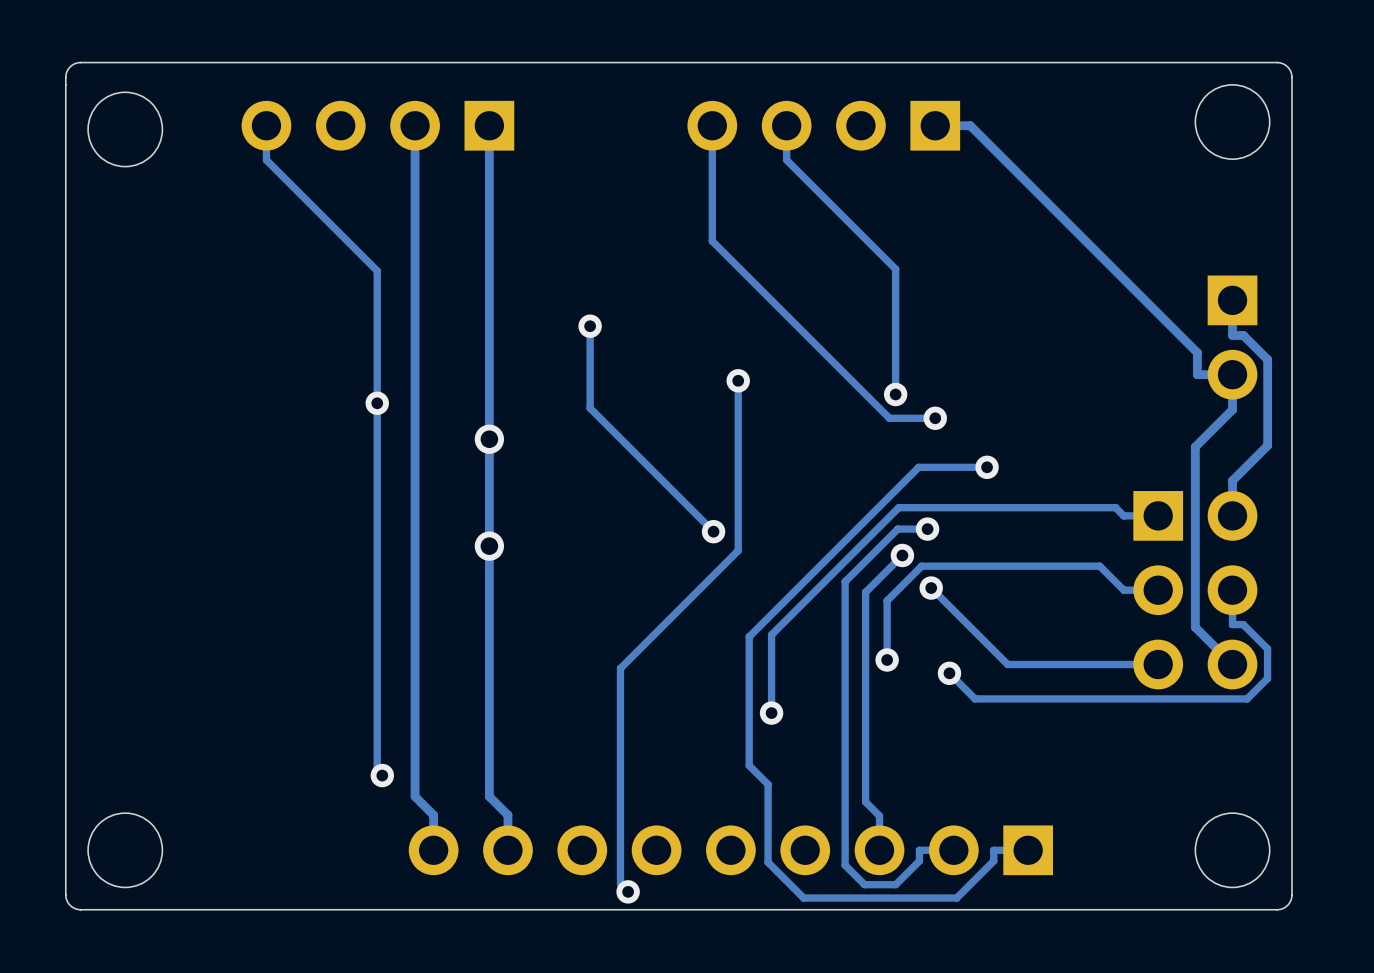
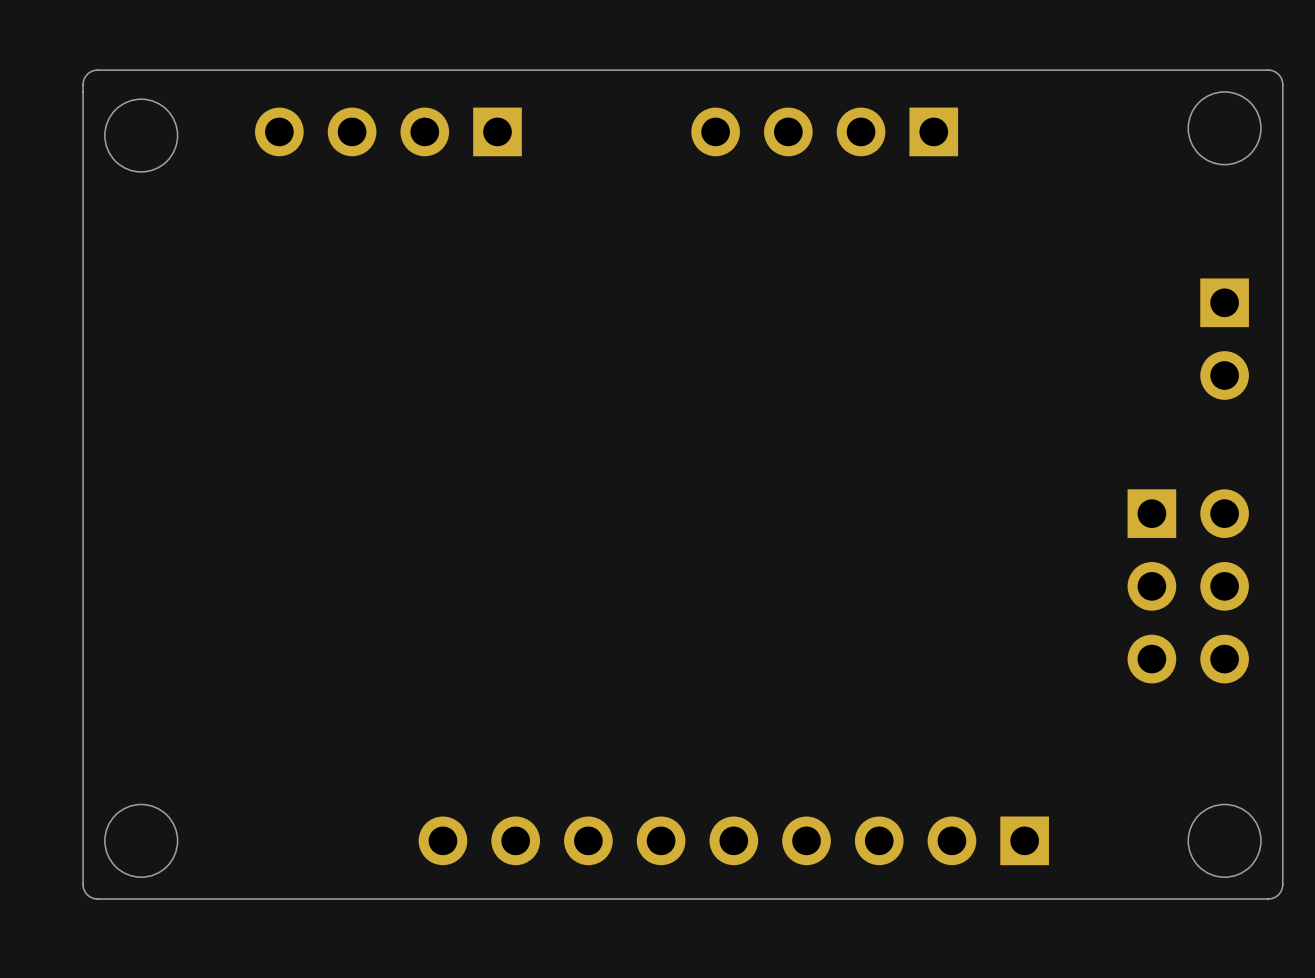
track: (266, 125) (266, 160) (377, 270) (377, 770) (382, 775) -> none
track: (415, 125) (415, 796) (433, 815) (433, 850) -> none
track: (489, 125) (489, 796) (507, 815) (507, 850) -> none
track: (712, 125) (712, 241) (889, 418) (935, 418) -> none
track: (786, 125) (786, 160) (895, 269) (895, 394) -> none
track: (935, 125) (970, 125) (1197, 352) (1197, 374) (1232, 374) (1232, 409) (1195, 446) (1195, 627) (1232, 664) -> none
track: (1232, 300) (1232, 335) (1243, 335) (1267, 359) (1267, 445) (1232, 480) (1232, 515) -> none
track: (590, 326) (590, 408) (713, 531) -> none
via: (590, 326) -> none
track: (738, 380) (738, 550) (620, 668) (620, 884) (628, 891) -> none
via: (738, 380) -> none
via: (895, 394) -> none
via: (377, 403) -> none
via: (935, 418) -> none
via: (489, 439) -> none
track: (987, 467) (918, 467) (749, 636) (749, 765) (768, 784) (768, 862) (803, 898) (956, 898) (993, 861) (993, 850) (1028, 850) -> none
via: (987, 467) -> none
track: (1158, 515) (1123, 515) (1115, 507) (898, 507) (771, 634) (771, 713) -> none
track: (927, 529) (897, 529) (845, 581) (845, 865) (864, 884) (895, 884) (919, 861) (919, 850) (953, 850) -> none
via: (927, 529) -> none
via: (713, 531) -> none
via: (489, 546) -> none
track: (902, 555) (865, 592) (865, 801) (879, 815) (879, 850) -> none
via: (902, 555) -> none
track: (931, 588) (1007, 664) (1158, 664) -> none
via: (931, 588) -> none
track: (1158, 590) (1123, 590) (1099, 566) (921, 566) (887, 600) (887, 659) -> none
track: (1232, 590) (1232, 624) (1243, 624) (1267, 648) (1267, 678) (1247, 698) (975, 698) (949, 673) -> none
via: (887, 659) -> none
via: (949, 673) -> none
via: (771, 713) -> none
via: (382, 775) -> none
via: (628, 891) -> none

